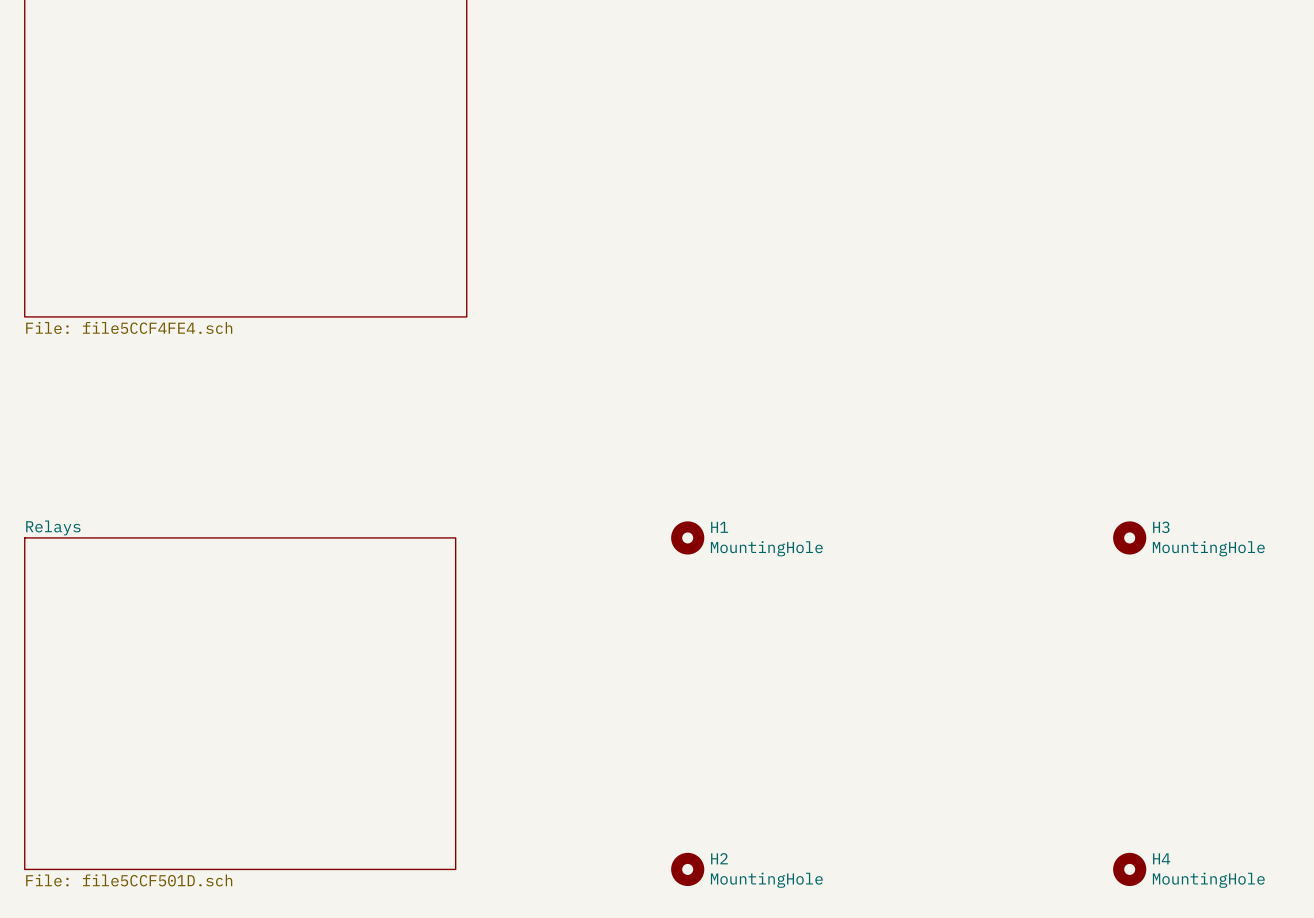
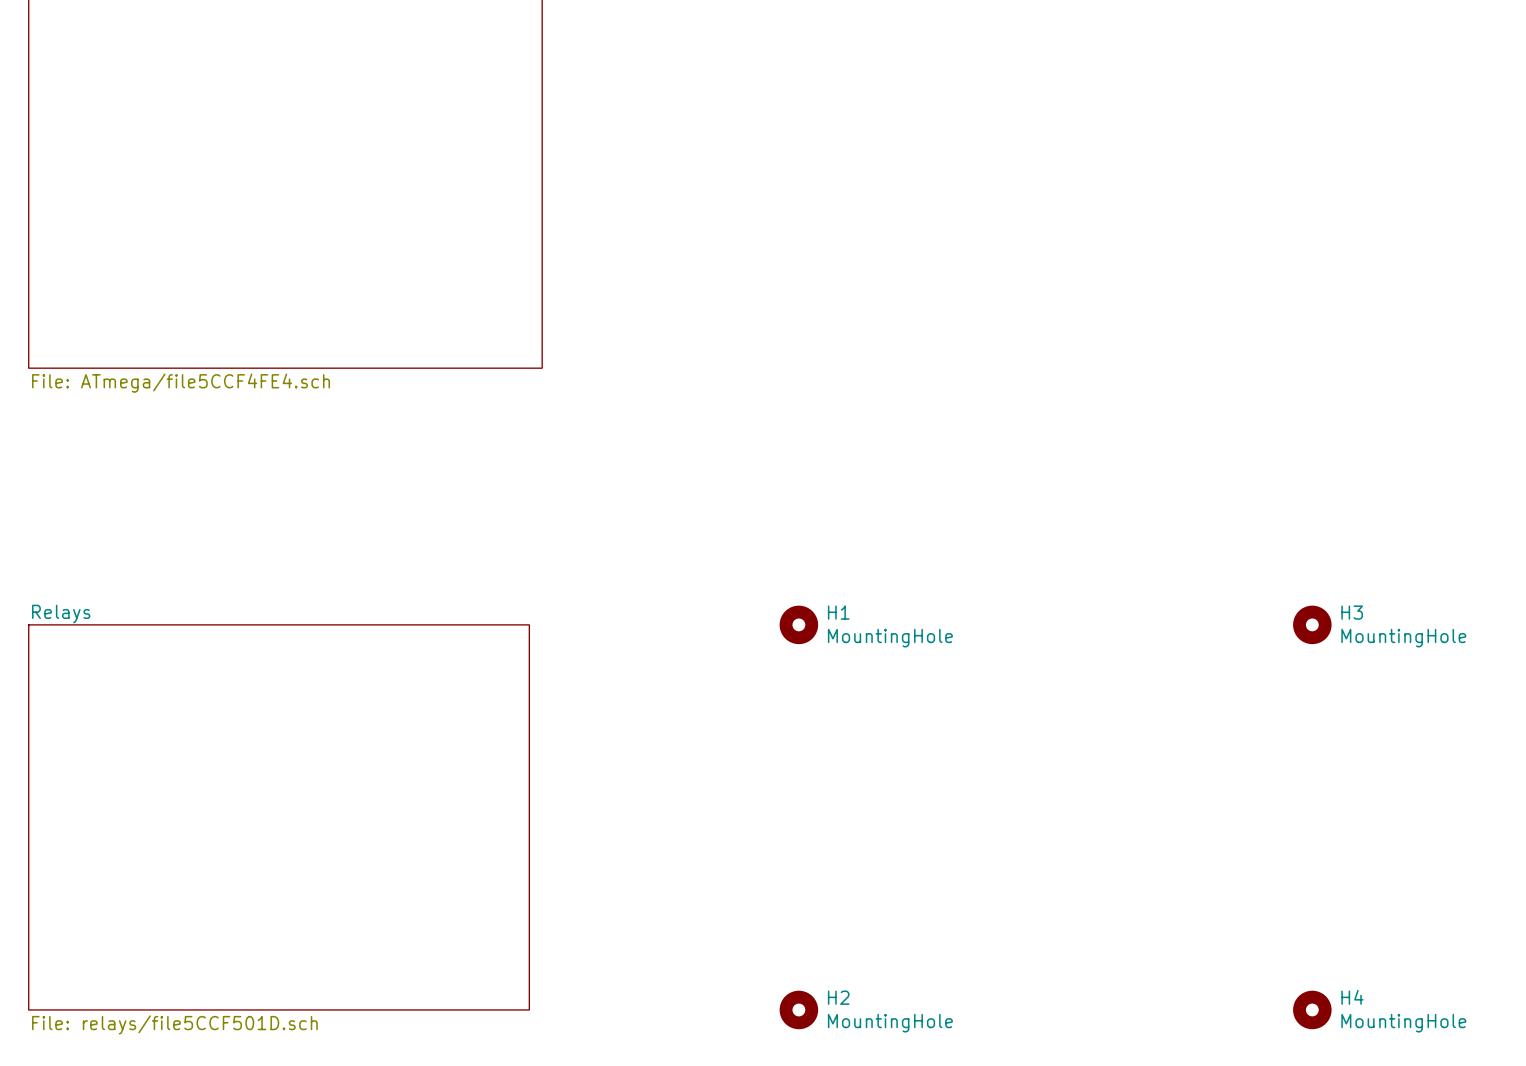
sheet value: File: file5CCF4FE4.sch (129, 327) -> File: ATmega/file5CCF4FE4.sch (181, 383)
sheet Relays value: File: file5CCF501D.sch (129, 880) -> File: relays/file5CCF501D.sch (174, 1024)

